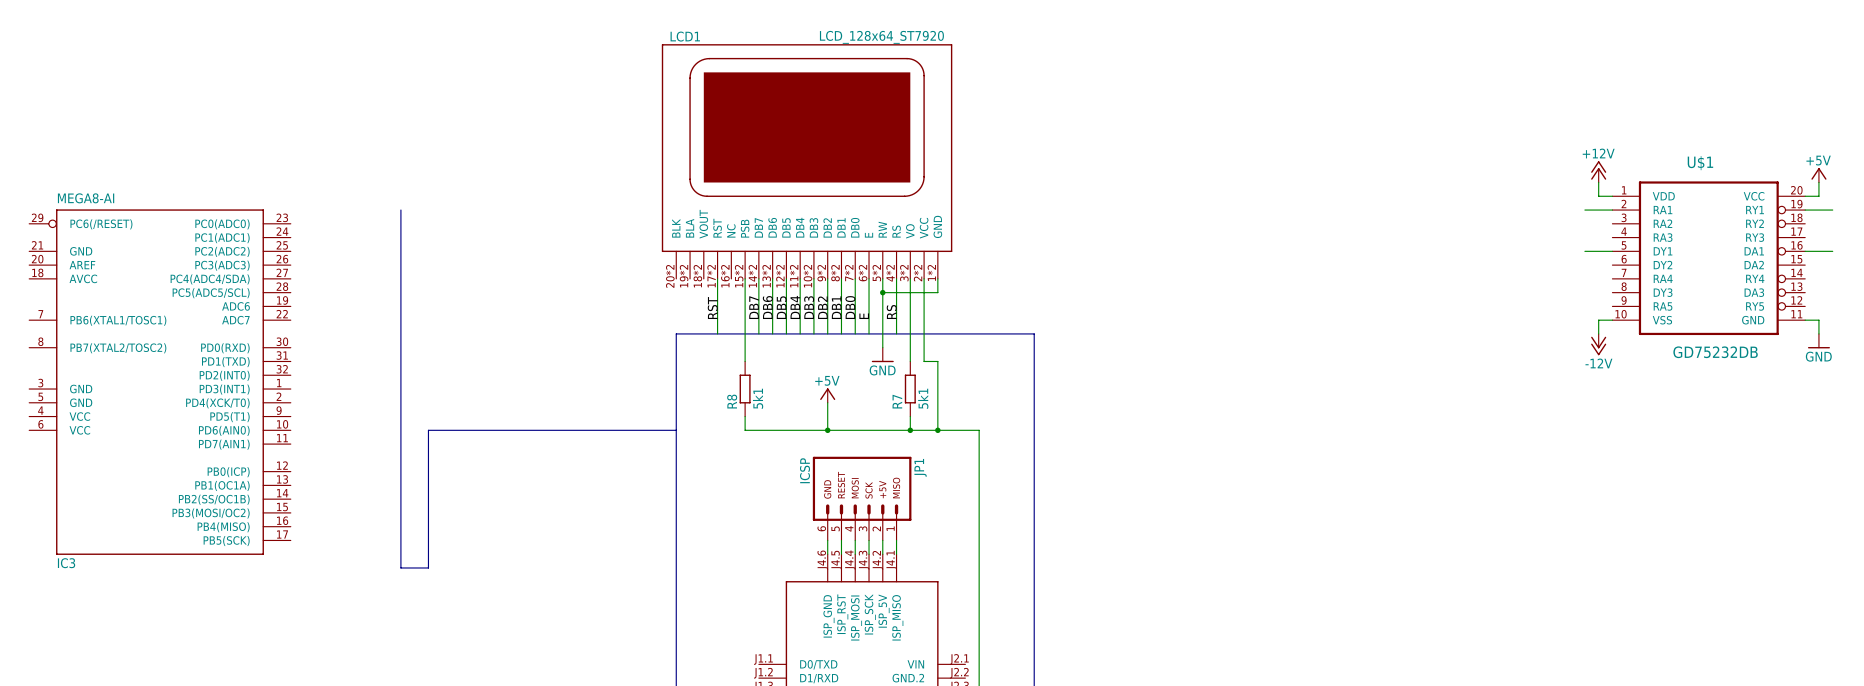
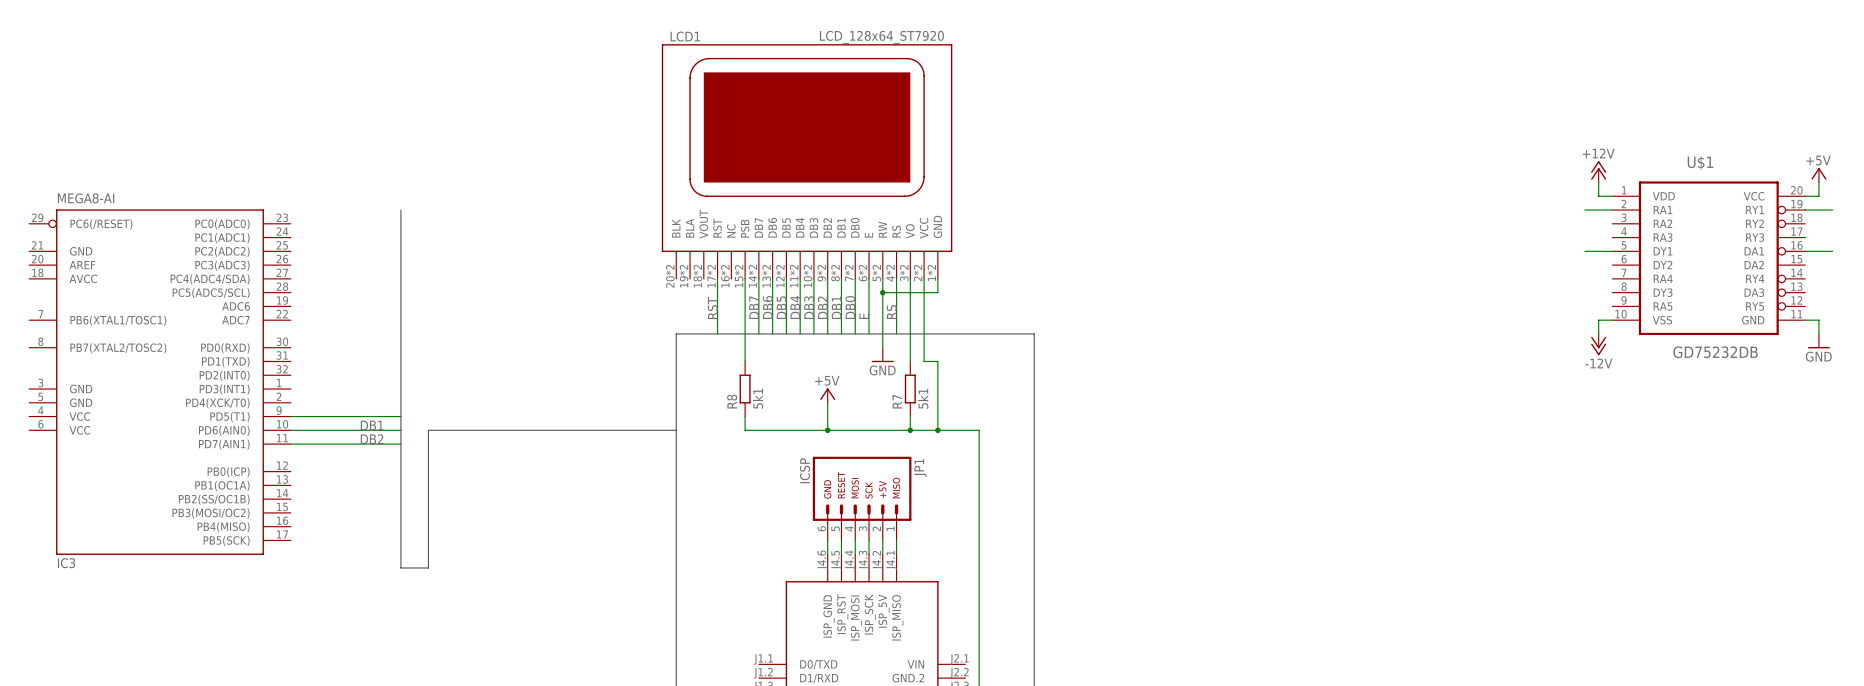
wire: none -> (290, 416) (400, 416)
label: none -> DB1 (372, 425)
wire: none -> (290, 430) (400, 430)
label: none -> DB2 (372, 439)
wire: none -> (290, 444) (400, 444)

